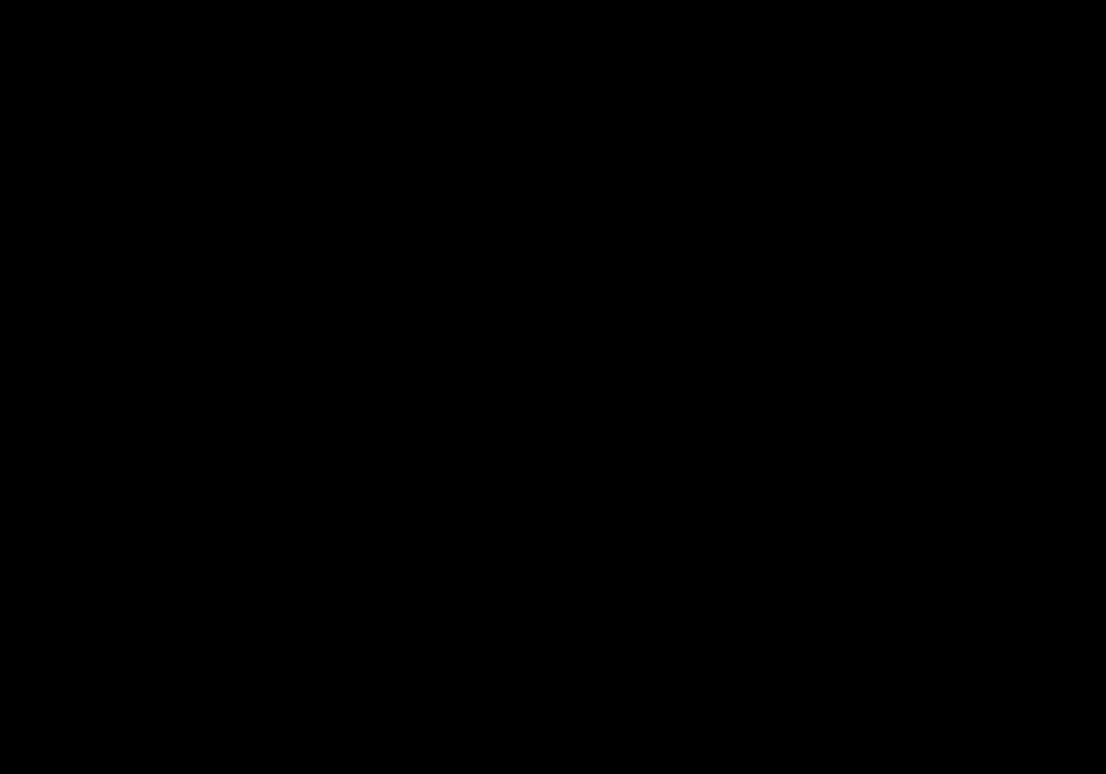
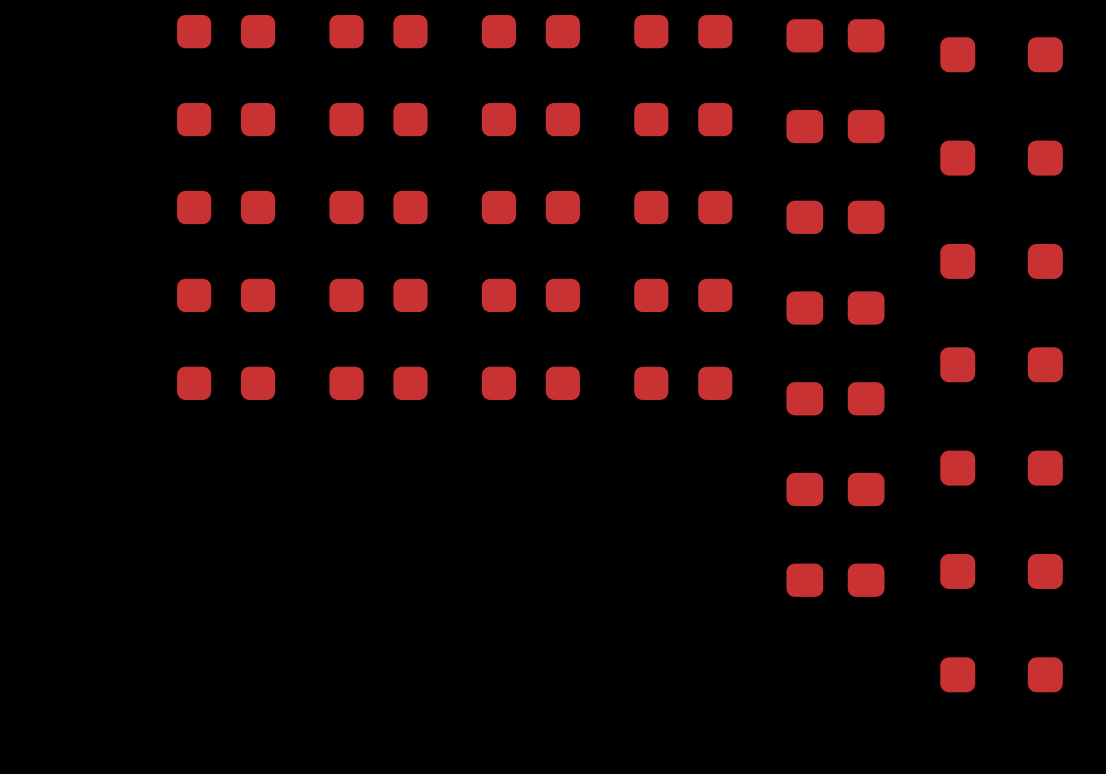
part: none -> (226, 31)
part: none -> (378, 31)
part: none -> (530, 31)
part: none -> (683, 31)
part: none -> (835, 35)
part: none -> (1001, 54)
part: none -> (226, 119)
part: none -> (378, 119)
part: none -> (530, 119)
part: none -> (683, 119)
part: none -> (835, 126)
part: none -> (1001, 158)
part: none -> (226, 207)
part: none -> (378, 207)
part: none -> (530, 207)
part: none -> (683, 207)
part: none -> (835, 217)
part: none -> (1001, 261)
part: none -> (226, 295)
part: none -> (378, 295)
part: none -> (530, 295)
part: none -> (683, 295)
part: none -> (835, 308)
part: none -> (1001, 364)
part: none -> (226, 383)
part: none -> (378, 383)
part: none -> (530, 383)
part: none -> (683, 383)
part: none -> (835, 398)
part: none -> (1001, 468)
part: none -> (835, 489)
part: none -> (1001, 571)
part: none -> (835, 580)
part: none -> (1001, 674)

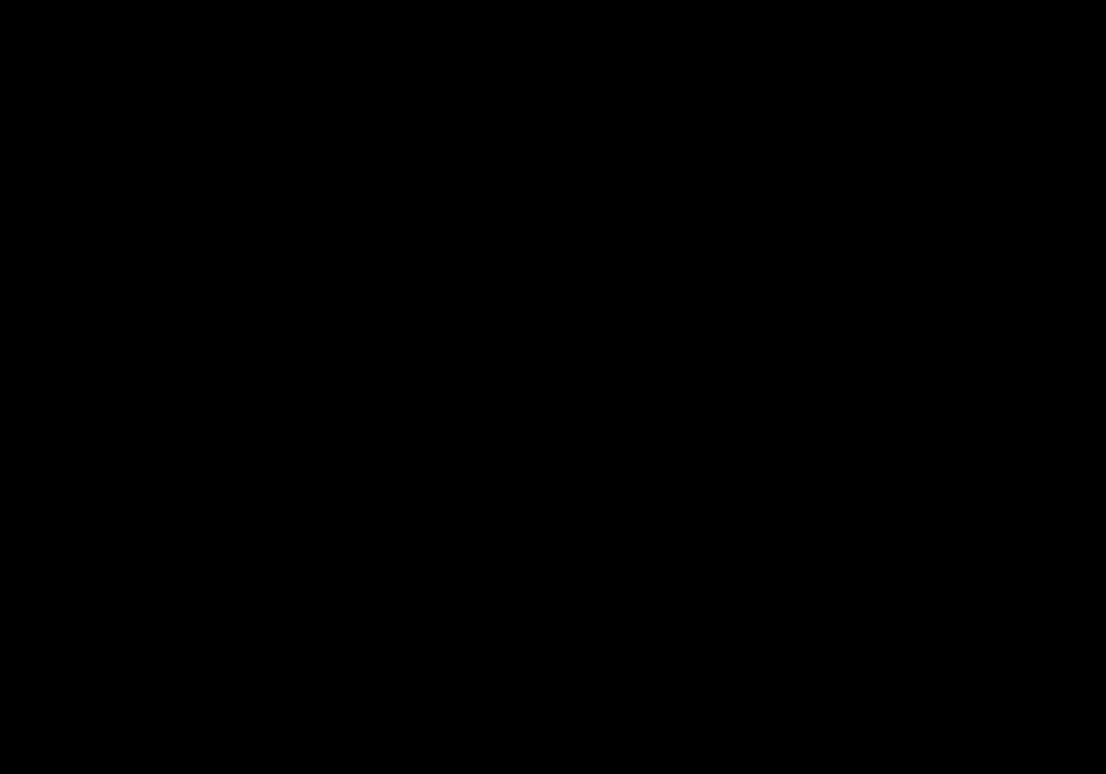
part: (226, 31) -> none
part: (378, 31) -> none
part: (530, 31) -> none
part: (683, 31) -> none
part: (835, 35) -> none
part: (1001, 54) -> none
part: (226, 119) -> none
part: (378, 119) -> none
part: (530, 119) -> none
part: (683, 119) -> none
part: (835, 126) -> none
part: (1001, 158) -> none
part: (226, 207) -> none
part: (378, 207) -> none
part: (530, 207) -> none
part: (683, 207) -> none
part: (835, 217) -> none
part: (1001, 261) -> none
part: (226, 295) -> none
part: (378, 295) -> none
part: (530, 295) -> none
part: (683, 295) -> none
part: (835, 308) -> none
part: (1001, 364) -> none
part: (226, 383) -> none
part: (378, 383) -> none
part: (530, 383) -> none
part: (683, 383) -> none
part: (835, 398) -> none
part: (1001, 468) -> none
part: (835, 489) -> none
part: (1001, 571) -> none
part: (835, 580) -> none
part: (1001, 674) -> none

